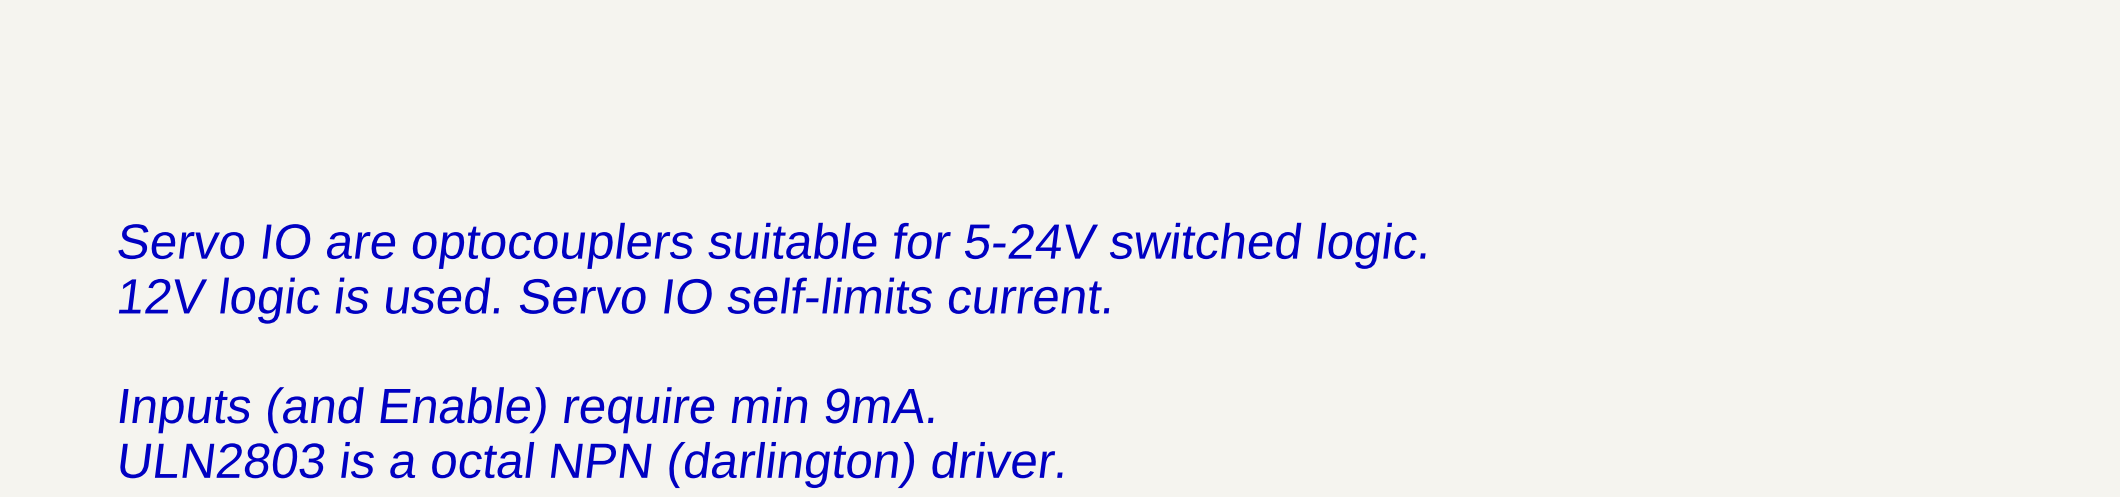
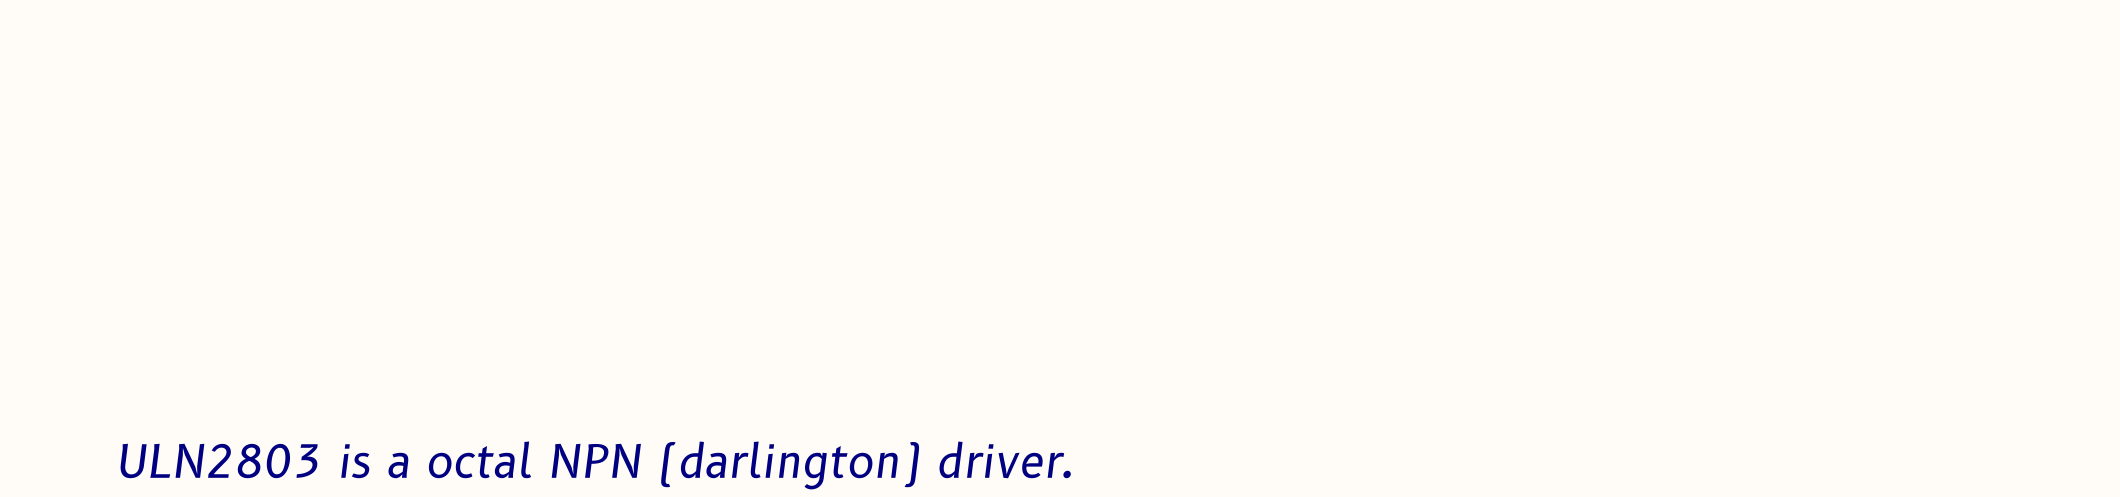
text: Servo IO are optocouplers suitable for 5-24V switched logic. (771, 245) -> none
text: 12V logic is used. Servo IO self-limits current. (614, 300) -> none
text: Inputs (and Enable) require min 9mA. (526, 410) -> none

